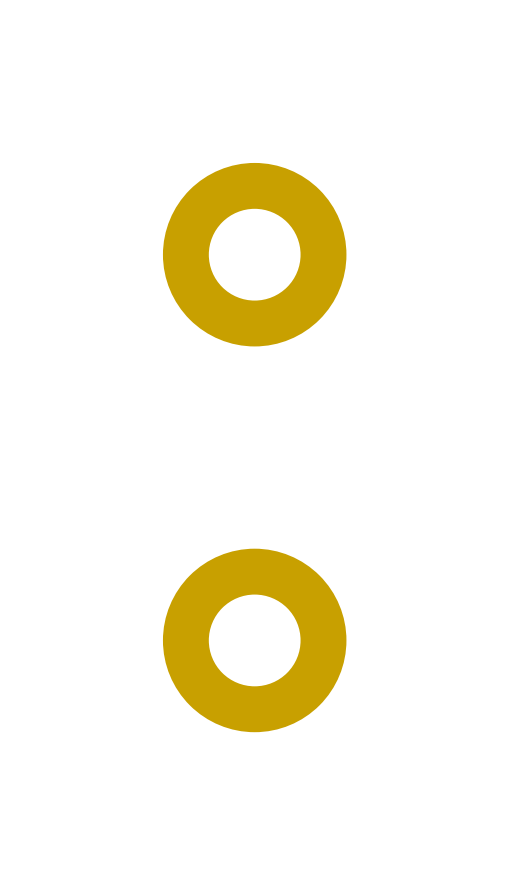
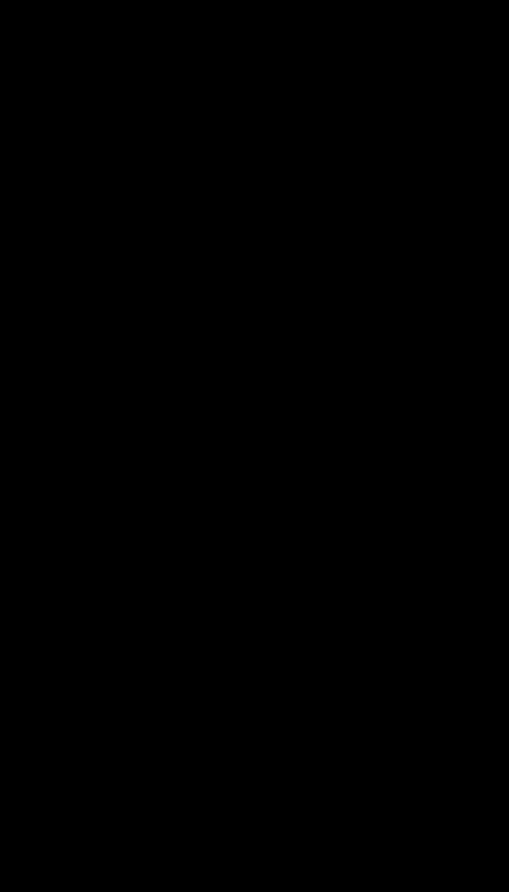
part: (254, 254) -> none
part: (254, 640) -> none

